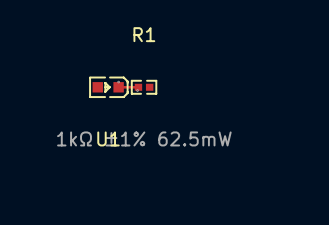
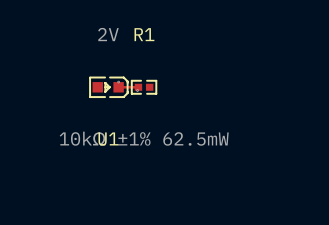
U1 value: none -> 2V (108, 34)
R1 value: 1kΩ ±1% 62.5mW (144, 138) -> 10kΩ ±1% 62.5mW (144, 138)

